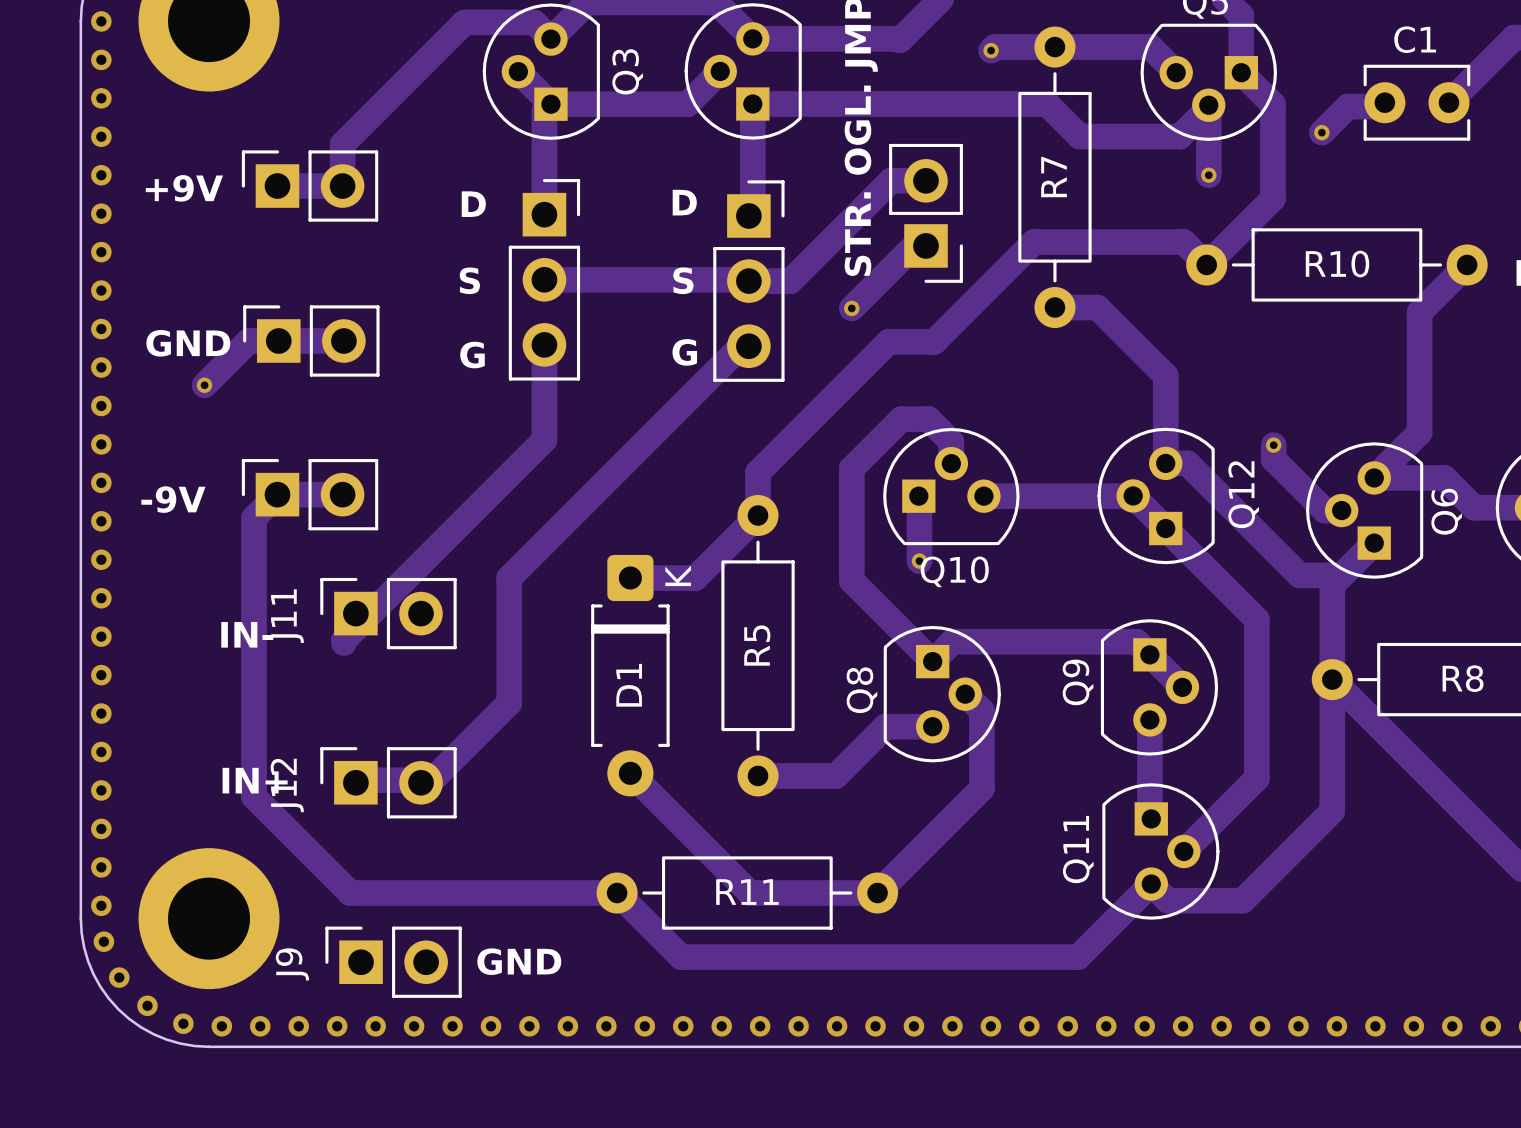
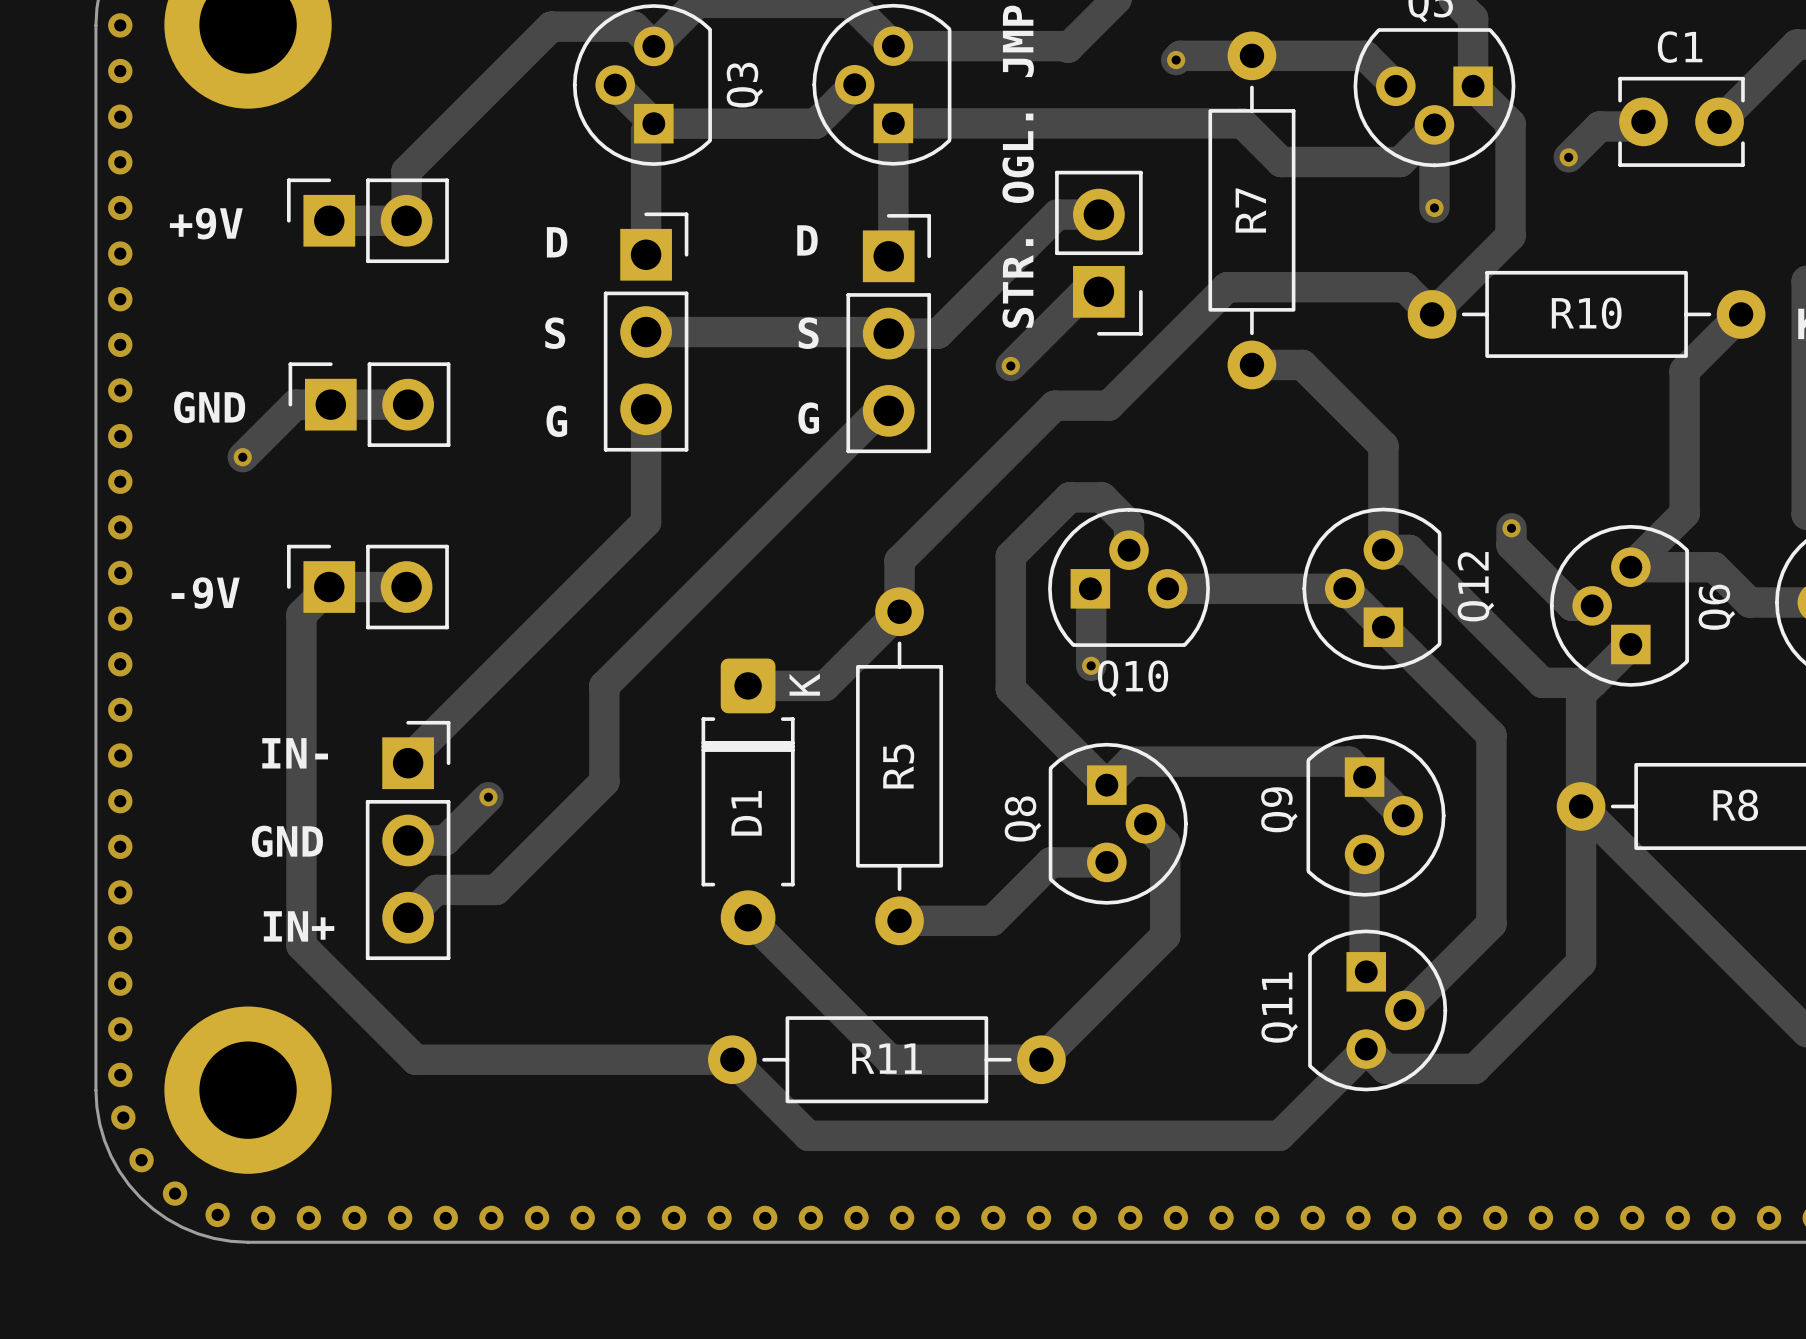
J11: (388, 613) -> none
track: (509, 658) (509, 702) (432, 780) (370, 780) (365, 785) -> (604, 781) (496, 889) (435, 889) (408, 917)
track: none -> (488, 797) (445, 840) (408, 840)
via: none -> (488, 797)
part: none -> (408, 840)
J12: (388, 782) -> none
text position: GND (519, 961) -> GND (287, 841)
J9: (393, 962) -> none

